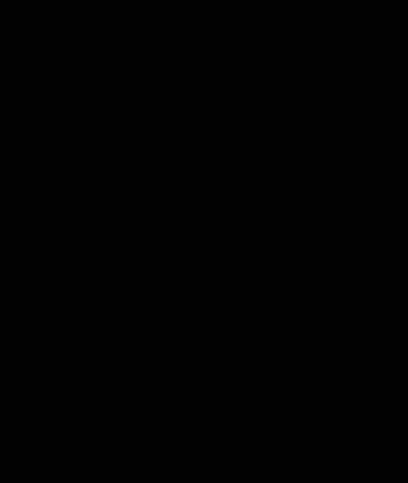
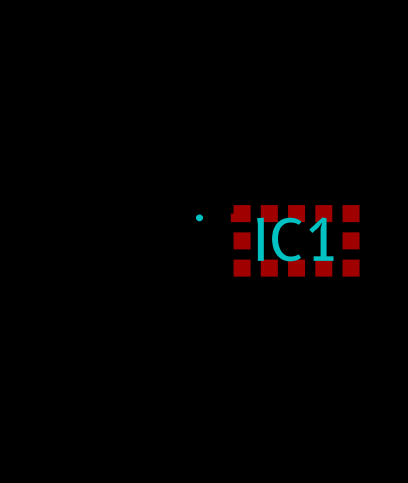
IC1: none -> (277, 240)

